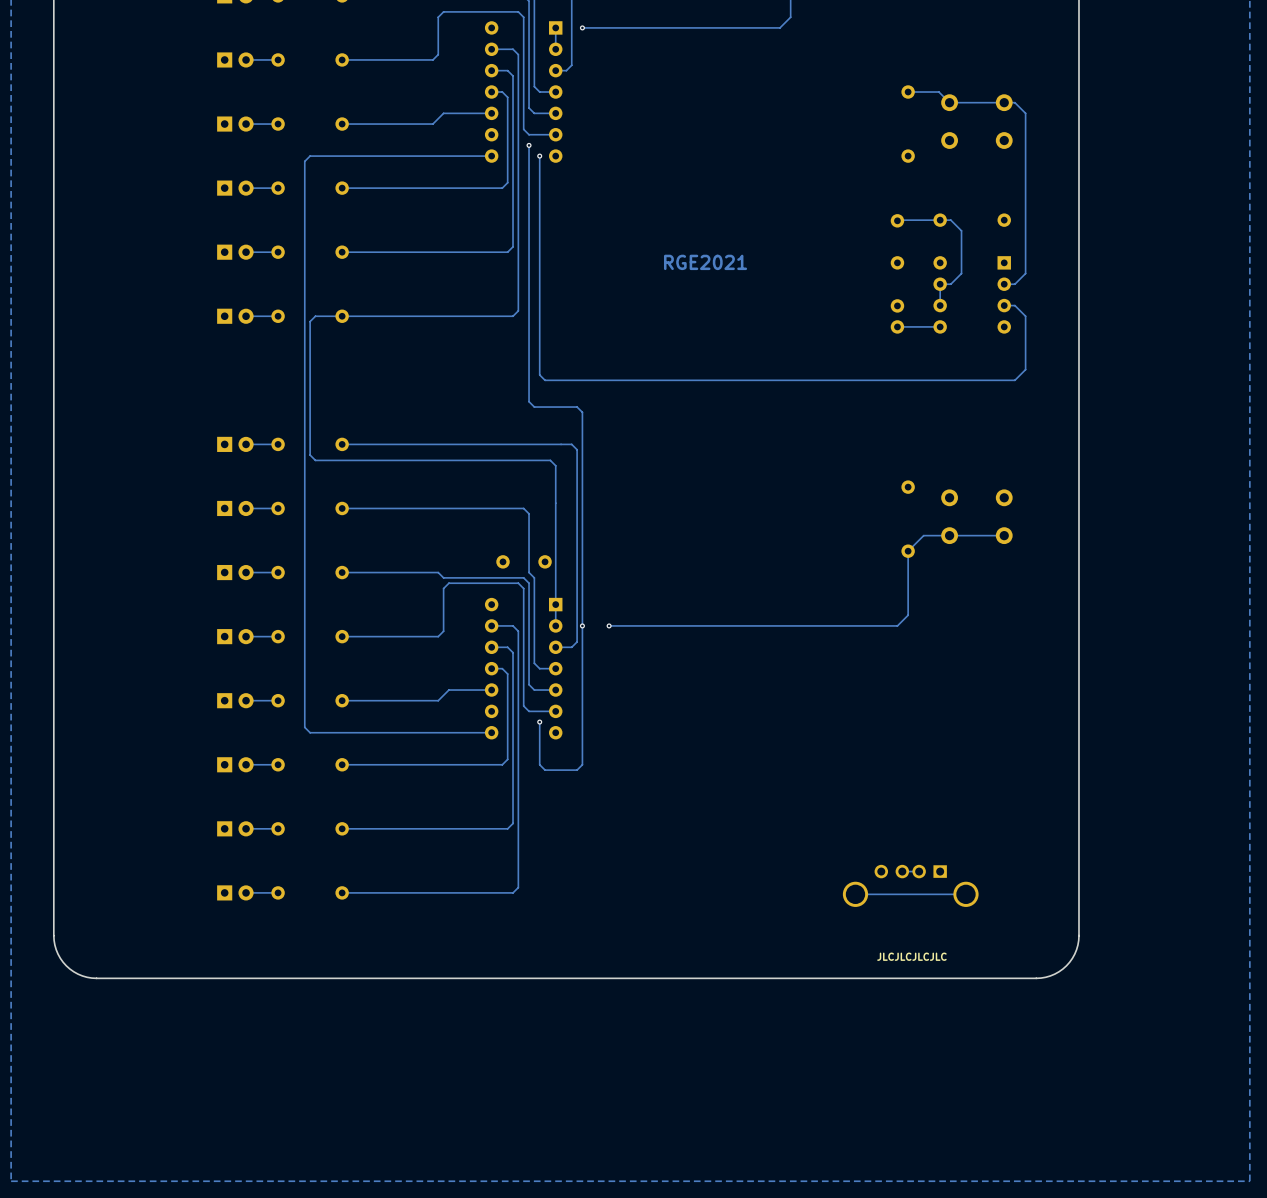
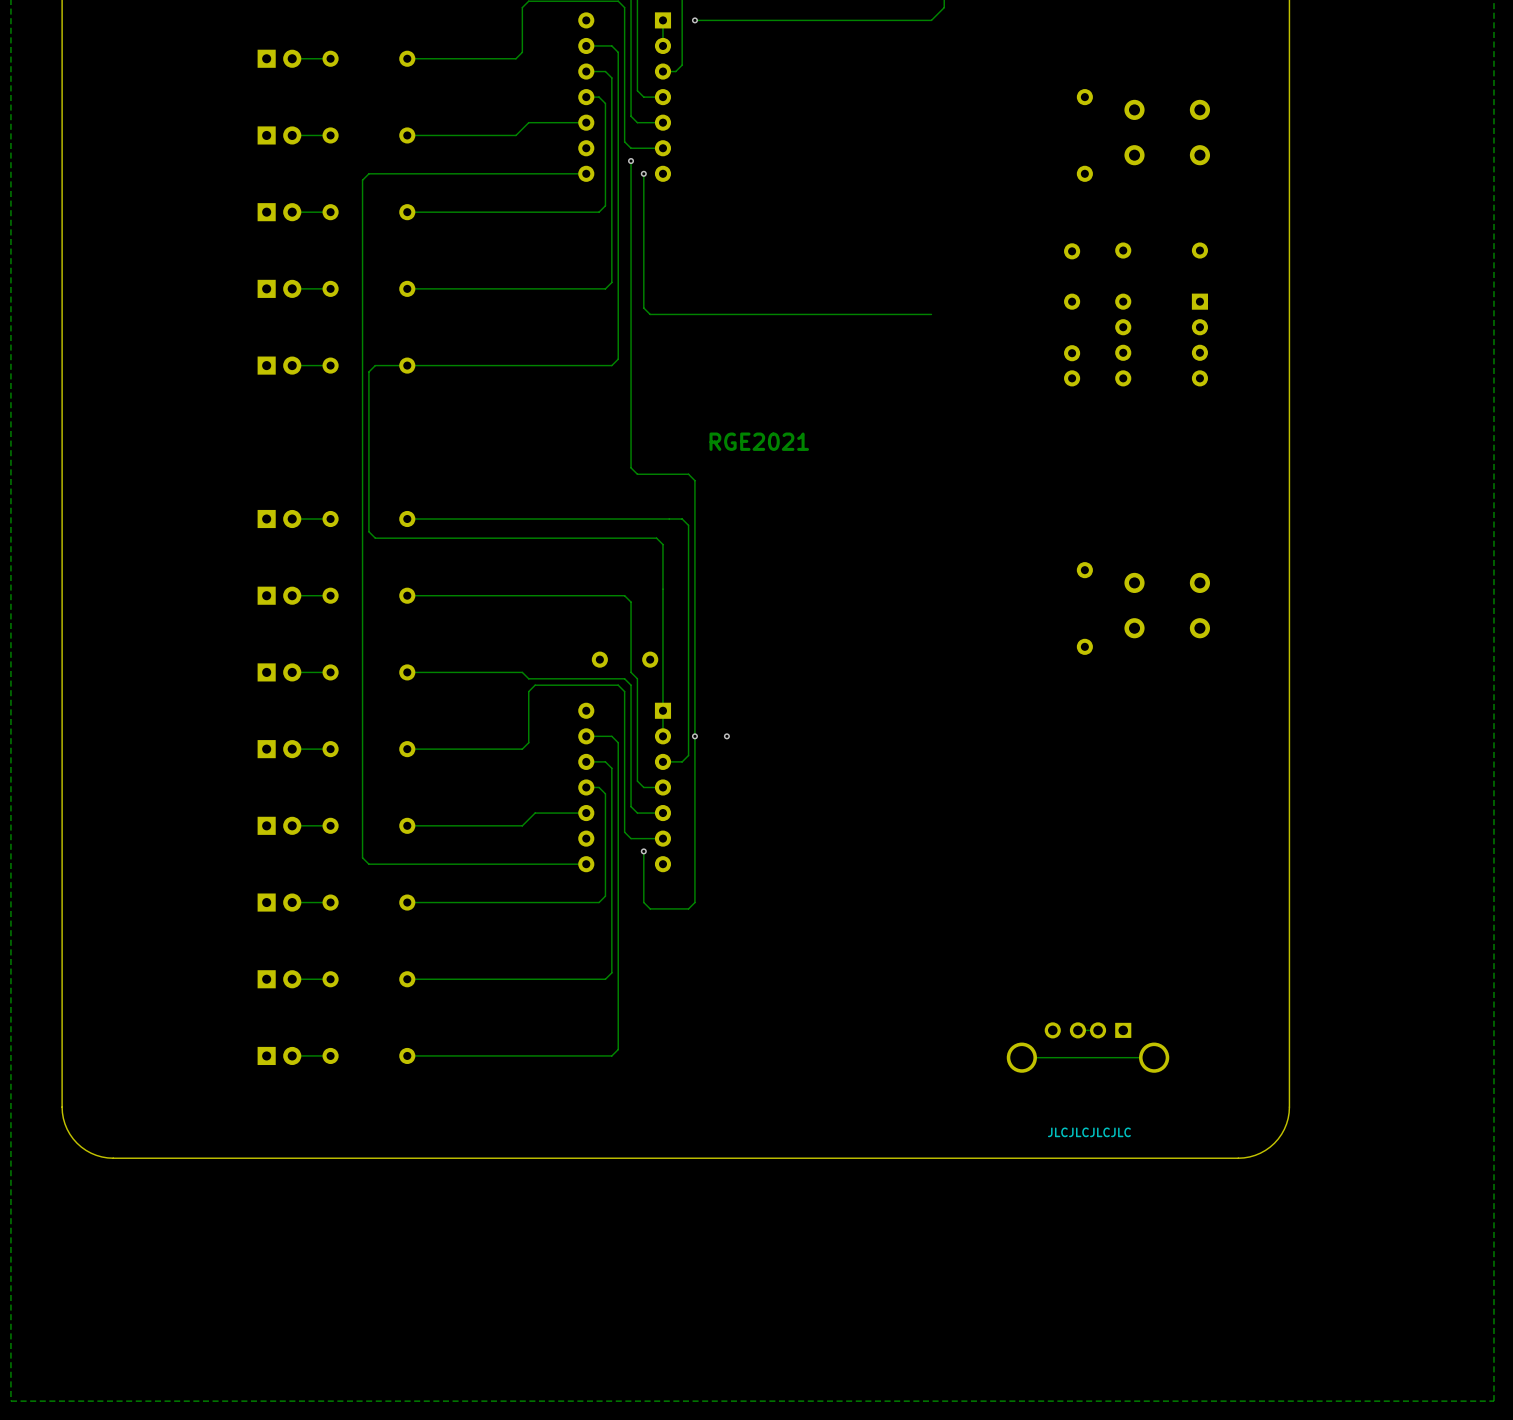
track: (908, 92) (938, 92) (949, 102) (1014, 102) (1025, 113) (1025, 273) (1014, 284) (1004, 284) -> none
track: (897, 220) (950, 220) (961, 230) (961, 273) (950, 284) (940, 284) (940, 305) -> none
text position: RGE2021 (705, 262) -> RGE2021 (759, 441)
track: (539, 268) (539, 374) (545, 380) (1014, 380) (1025, 369) (1025, 316) (1014, 305) (1004, 305) -> (643, 308) (650, 314) (931, 314)
track: (940, 326) (897, 326) -> none
track: (1004, 535) (923, 535) (908, 551) (908, 615) (897, 625) (609, 625) -> none

